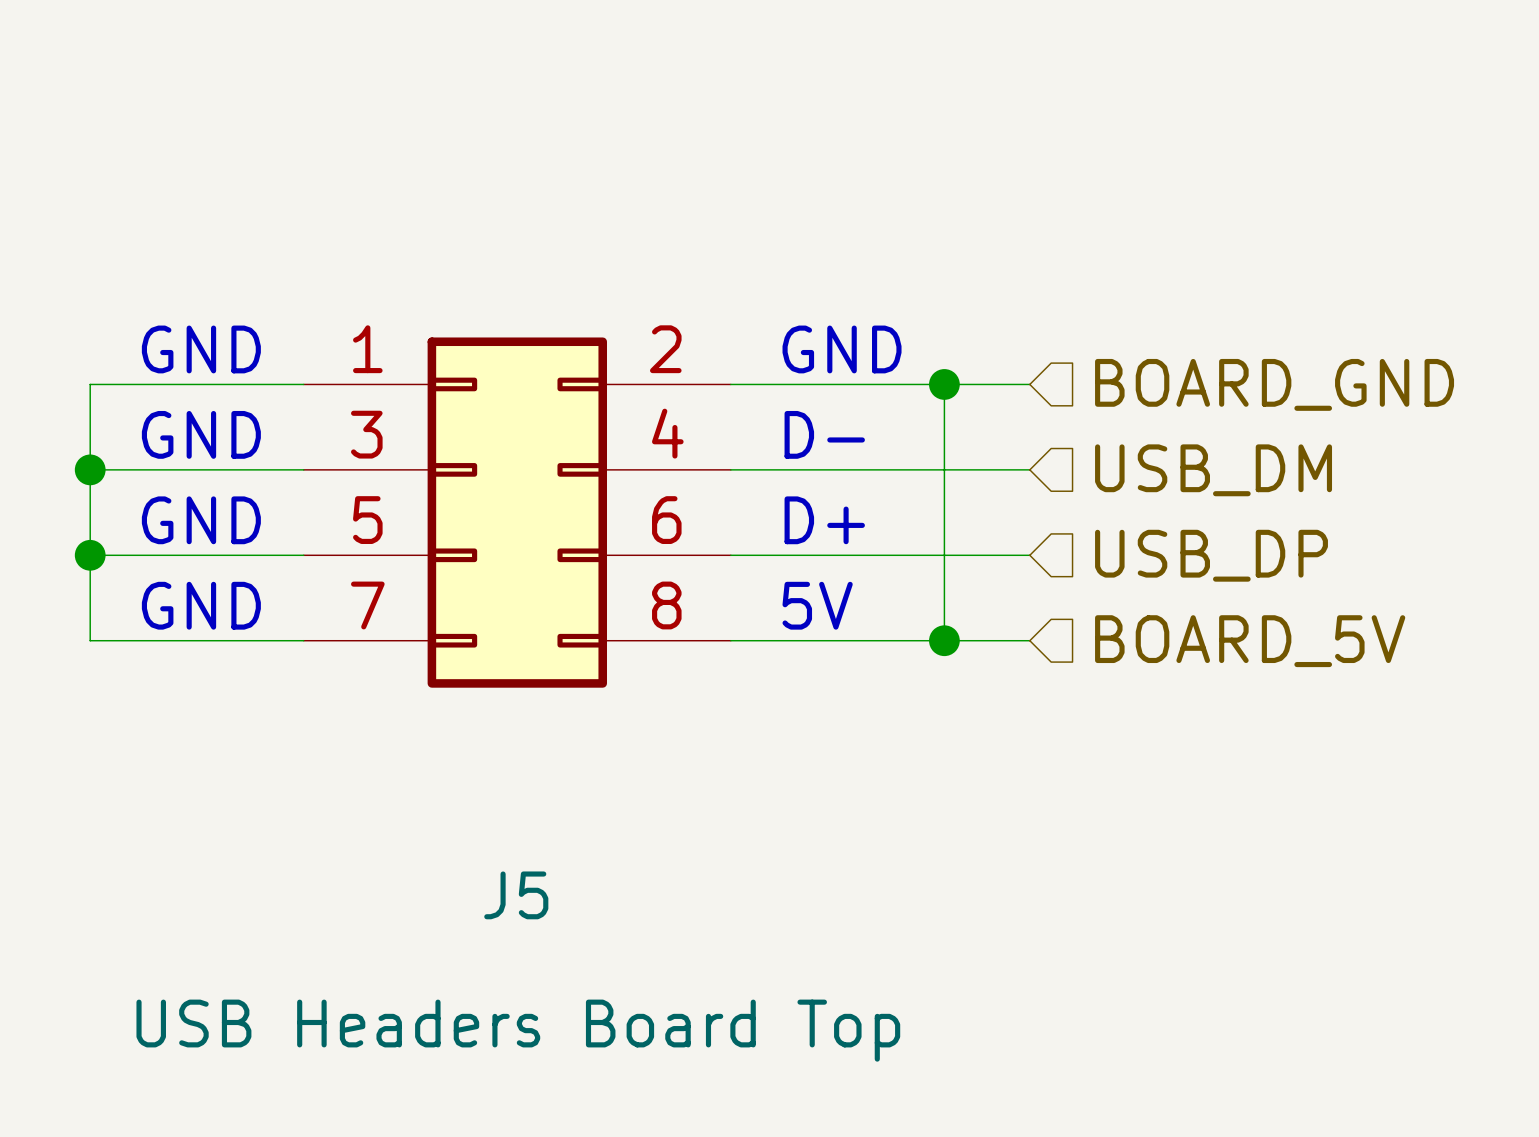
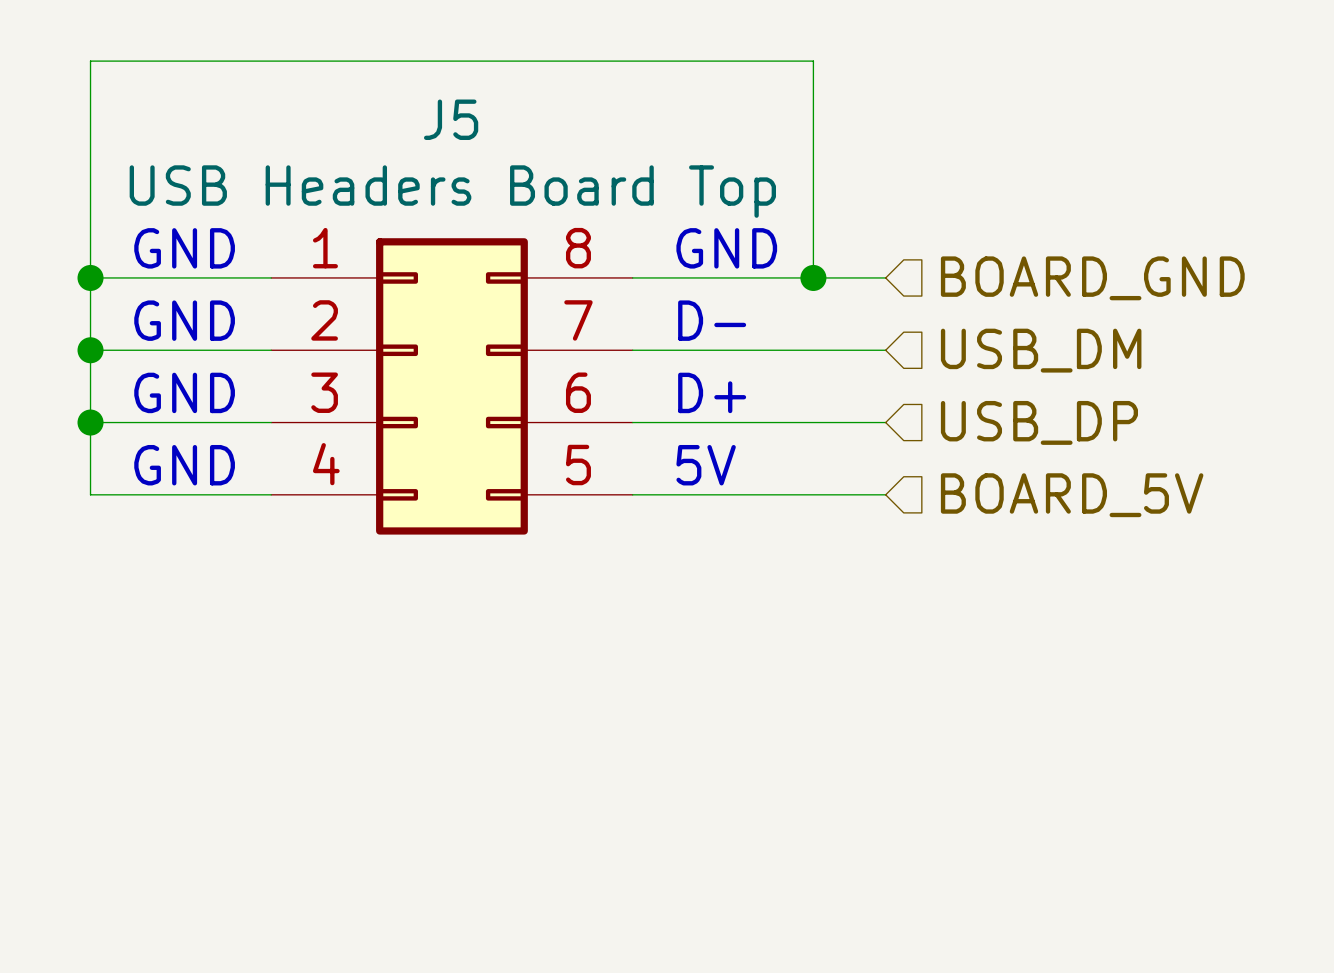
text: none -> GND (726, 248)
wire: none -> (90, 277) (271, 277)
junction: none -> (90, 277)
wire: none -> (813, 277) (813, 61) (90, 61) (90, 350)
hierarchical label: none -> BOARD_GND (1092, 278)
J5 pin number: 2 (665, 349) -> 8 (578, 248)
text: GND (842, 349) -> D- (712, 320)
junction: none -> (90, 350)
wire: (944, 384) (944, 640) -> none
junction position: (944, 384) -> (813, 277)
hierarchical label: BOARD_GND (1274, 384) -> USB_DM (1041, 350)
J5 pin number: 4 (667, 433) -> 7 (578, 320)
J5 pin number: 3 (366, 434) -> 2 (324, 320)
text: D- (824, 434) -> D+ (712, 392)
hierarchical label: USB_DM (1213, 470) -> USB_DP (1039, 422)
J5 position: (517, 512) -> (451, 386)
J5 pin number: 5 (367, 520) -> 3 (324, 392)
text: D+ (824, 520) -> 5V (706, 465)
wire: (90, 555) (90, 640) (303, 640) -> none
junction: (90, 555) -> none
hierarchical label: USB_DP (1211, 555) -> BOARD_5V (1072, 495)
text position: GND (201, 605) -> GND (184, 248)
J5 pin number: 7 (367, 605) -> 4 (326, 464)
J5 pin number: 8 (666, 605) -> 5 (578, 465)
text: 5V (817, 605) -> none
wire: (730, 640) (1029, 640) -> (632, 277) (885, 277)
junction: (944, 640) -> none
hierarchical label: BOARD_5V (1250, 641) -> none
J5 name position: J5 (516, 895) -> J5 (451, 119)
J5 value position: USB Headers Board Top (518, 1030) -> USB Headers Board Top (452, 191)

